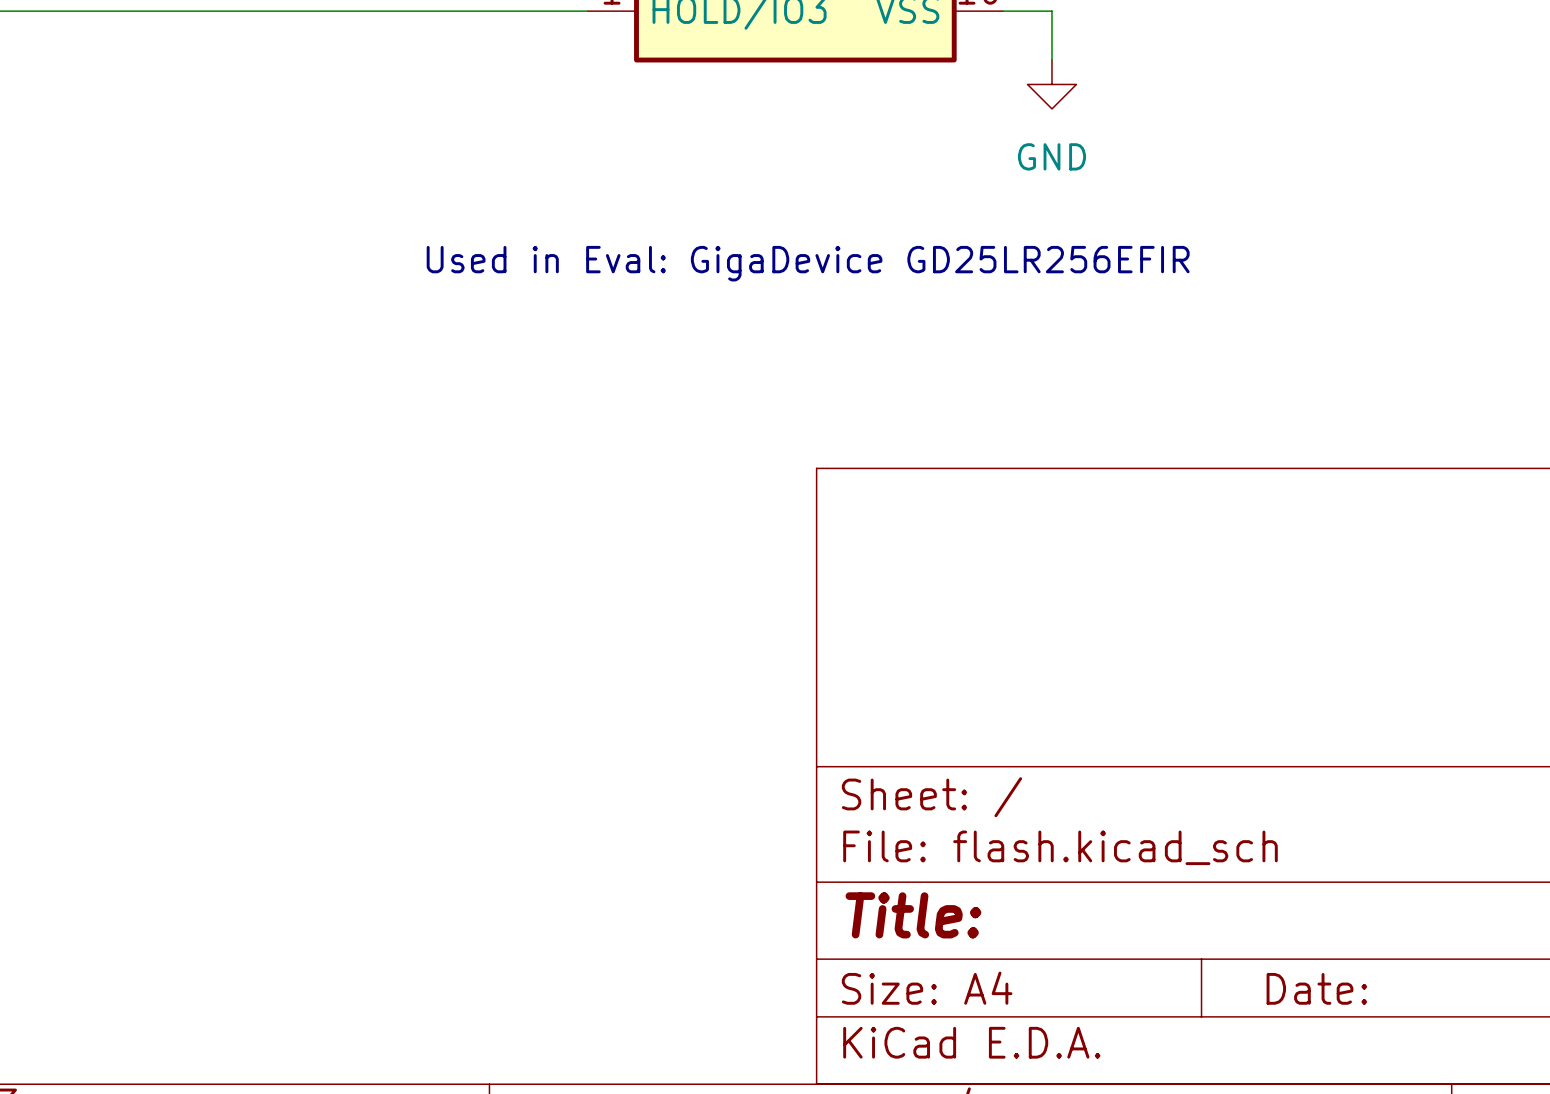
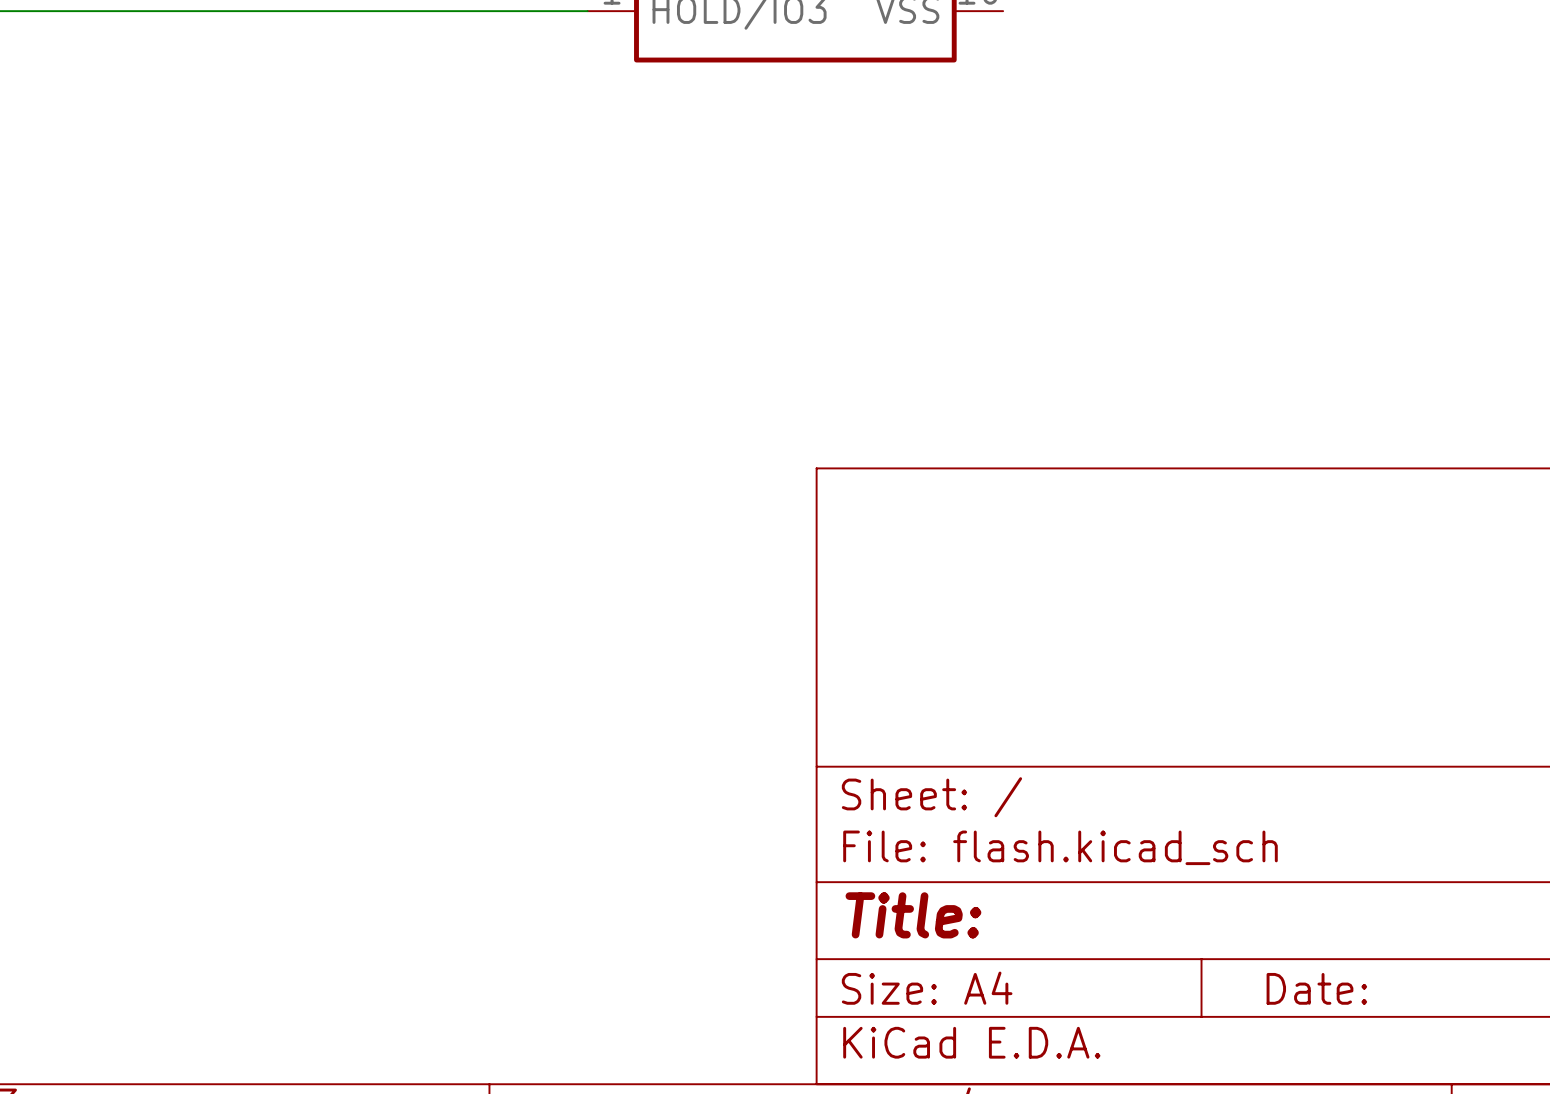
wire: (1003, 11) (1051, 11) (1051, 60) -> none
power symbol: GND (1051, 84) -> none
text: Used in Eval: GigaDevice GD25LR256EFIR (808, 263) -> none

